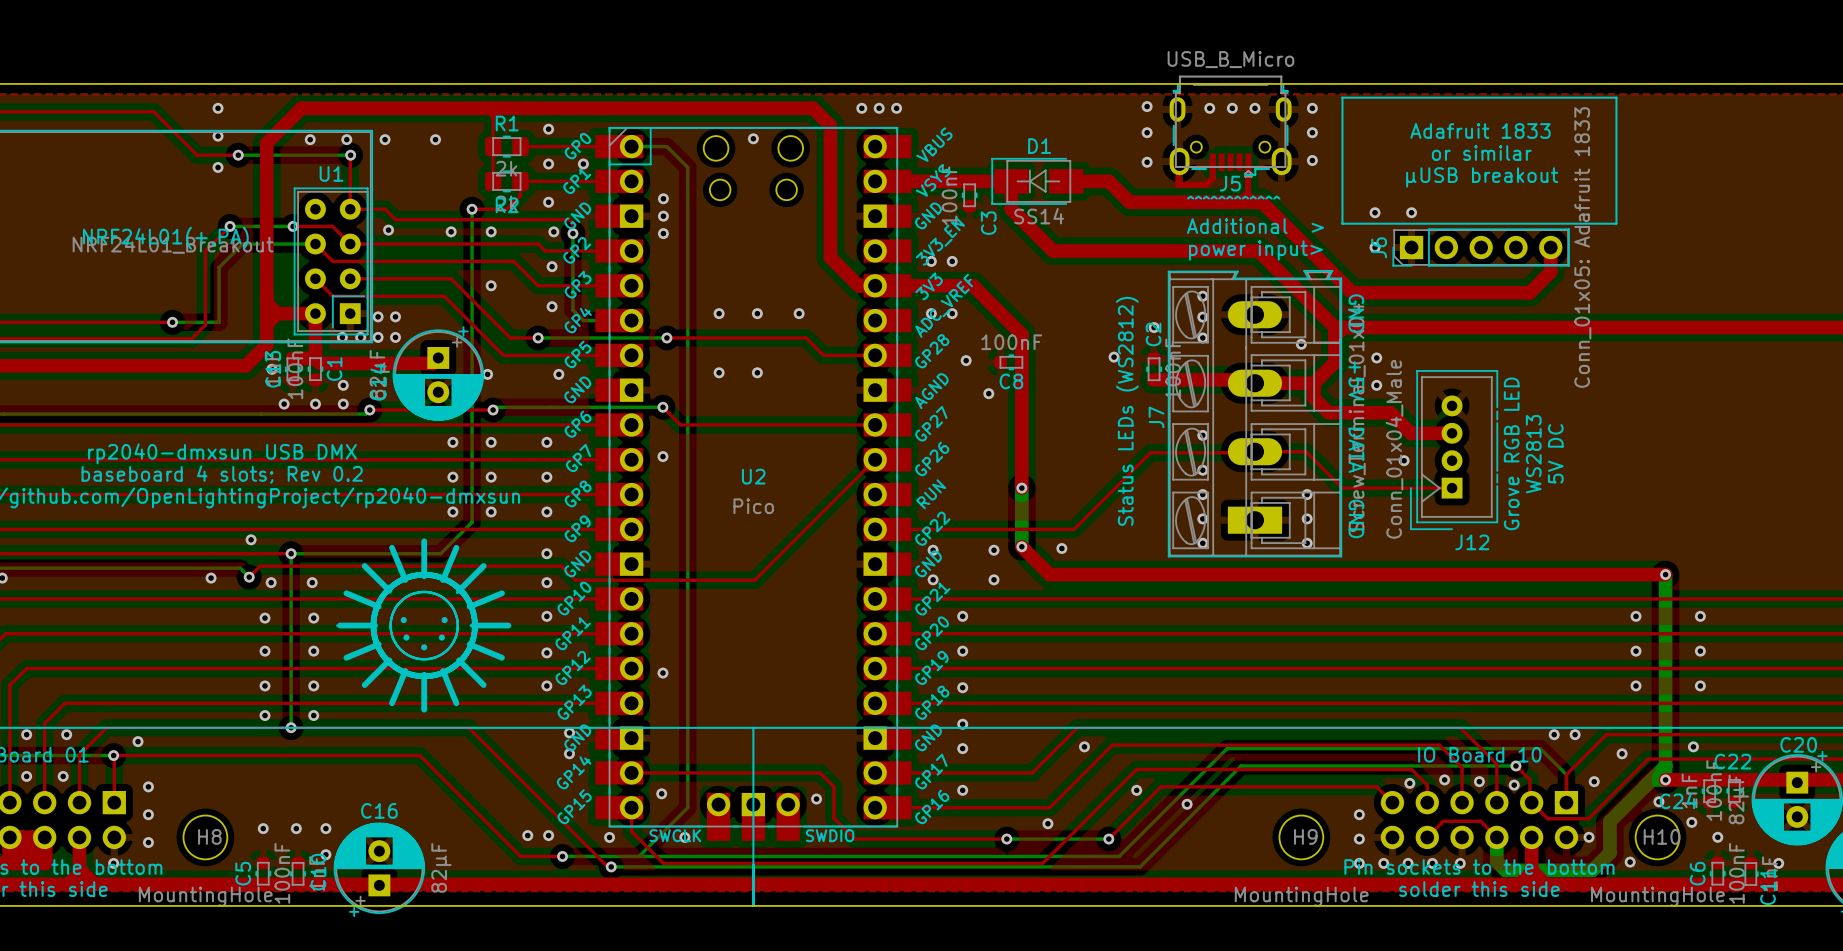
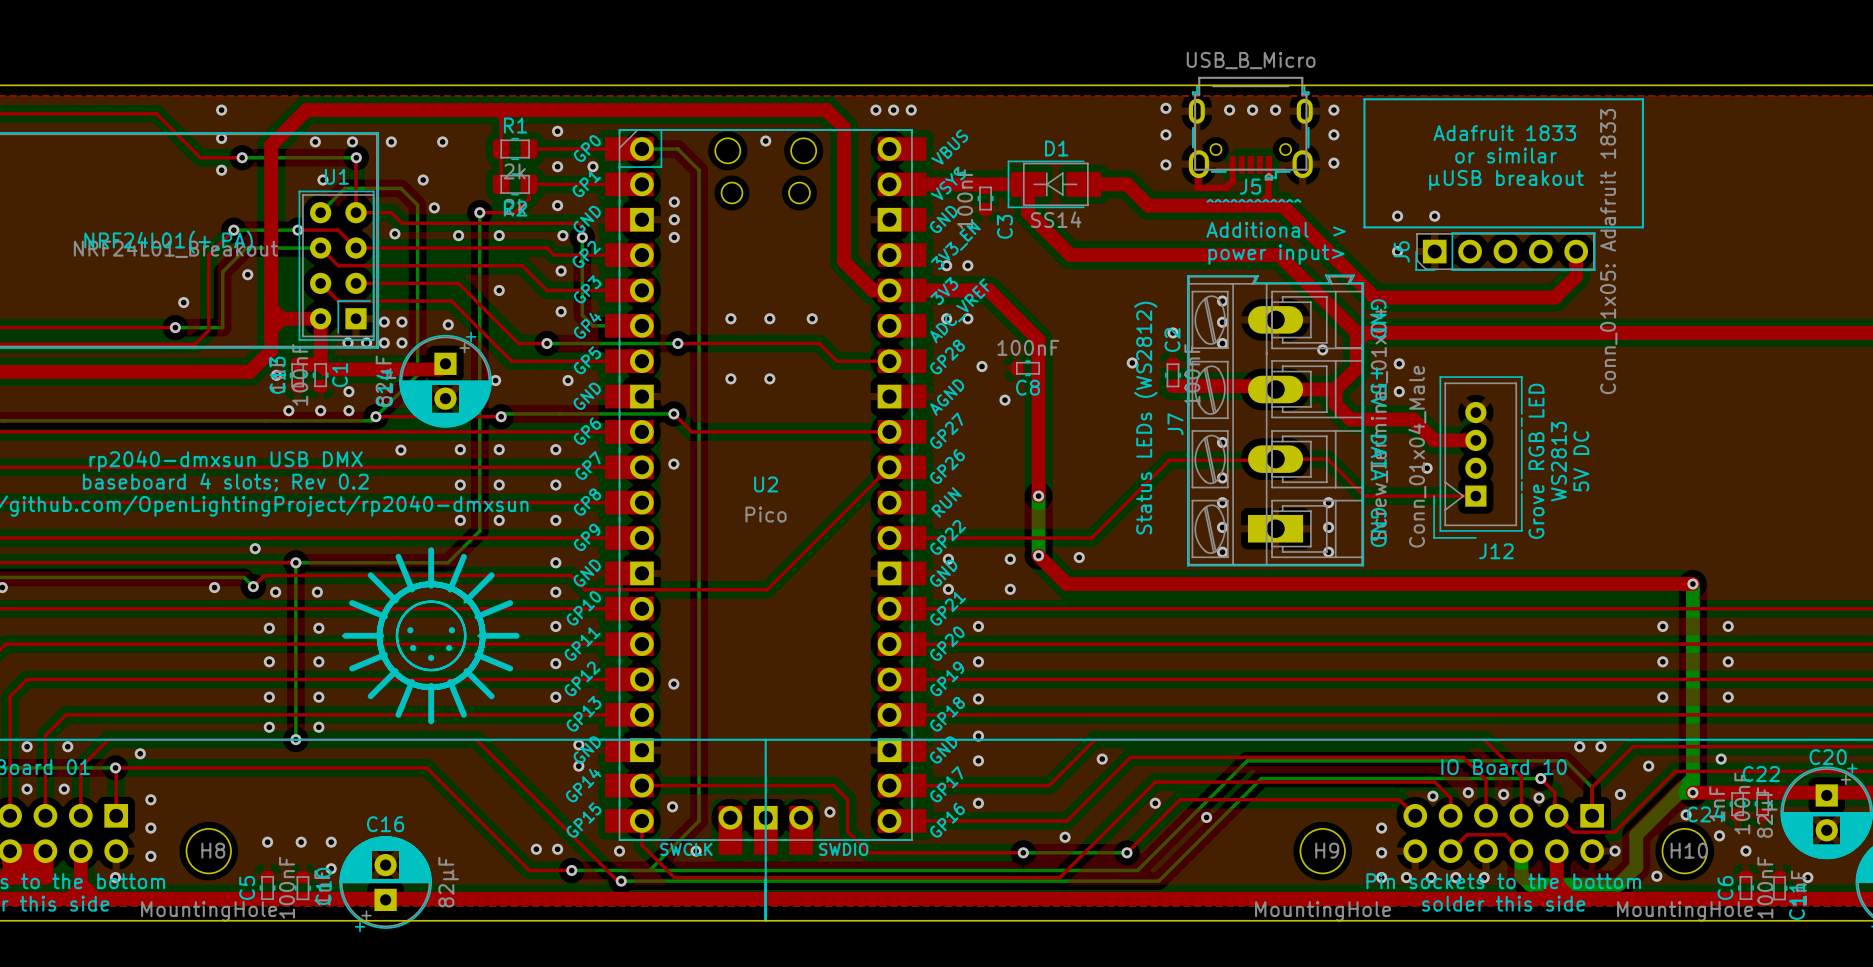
via: none -> (322, 180)
via: none -> (423, 180)
via: none -> (434, 207)
bottom track: none -> (320, 212) (344, 188) (400, 188) (417, 205) (417, 374) (375, 416)
via: none -> (247, 274)
via: none -> (183, 302)
via: none -> (448, 324)
via: none -> (400, 450)

